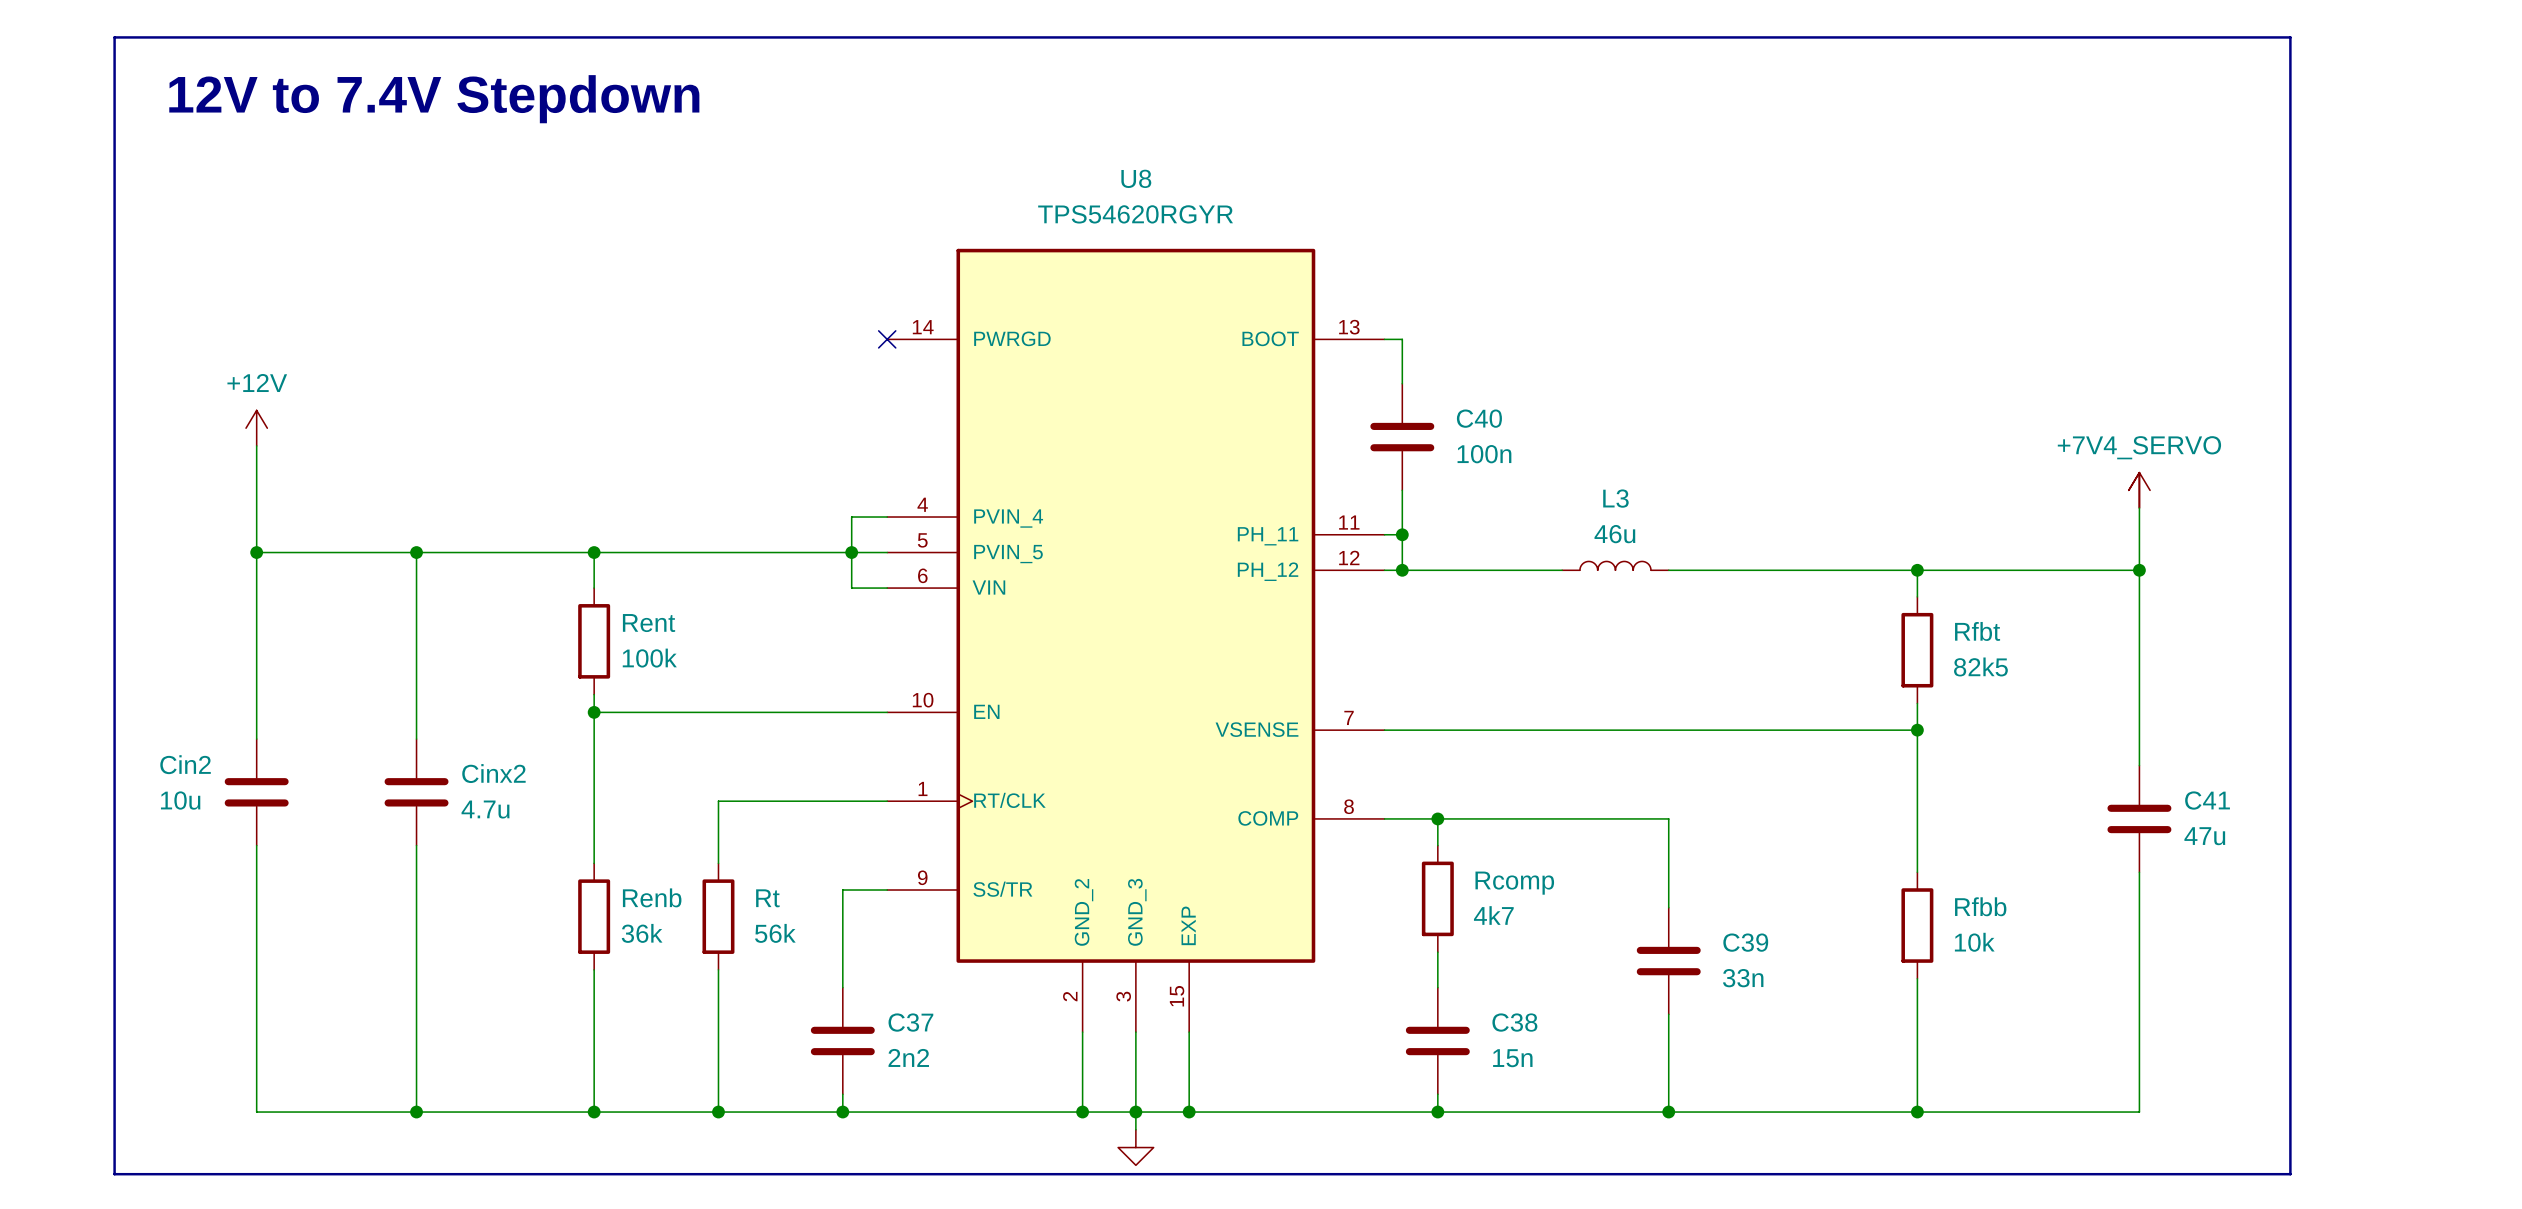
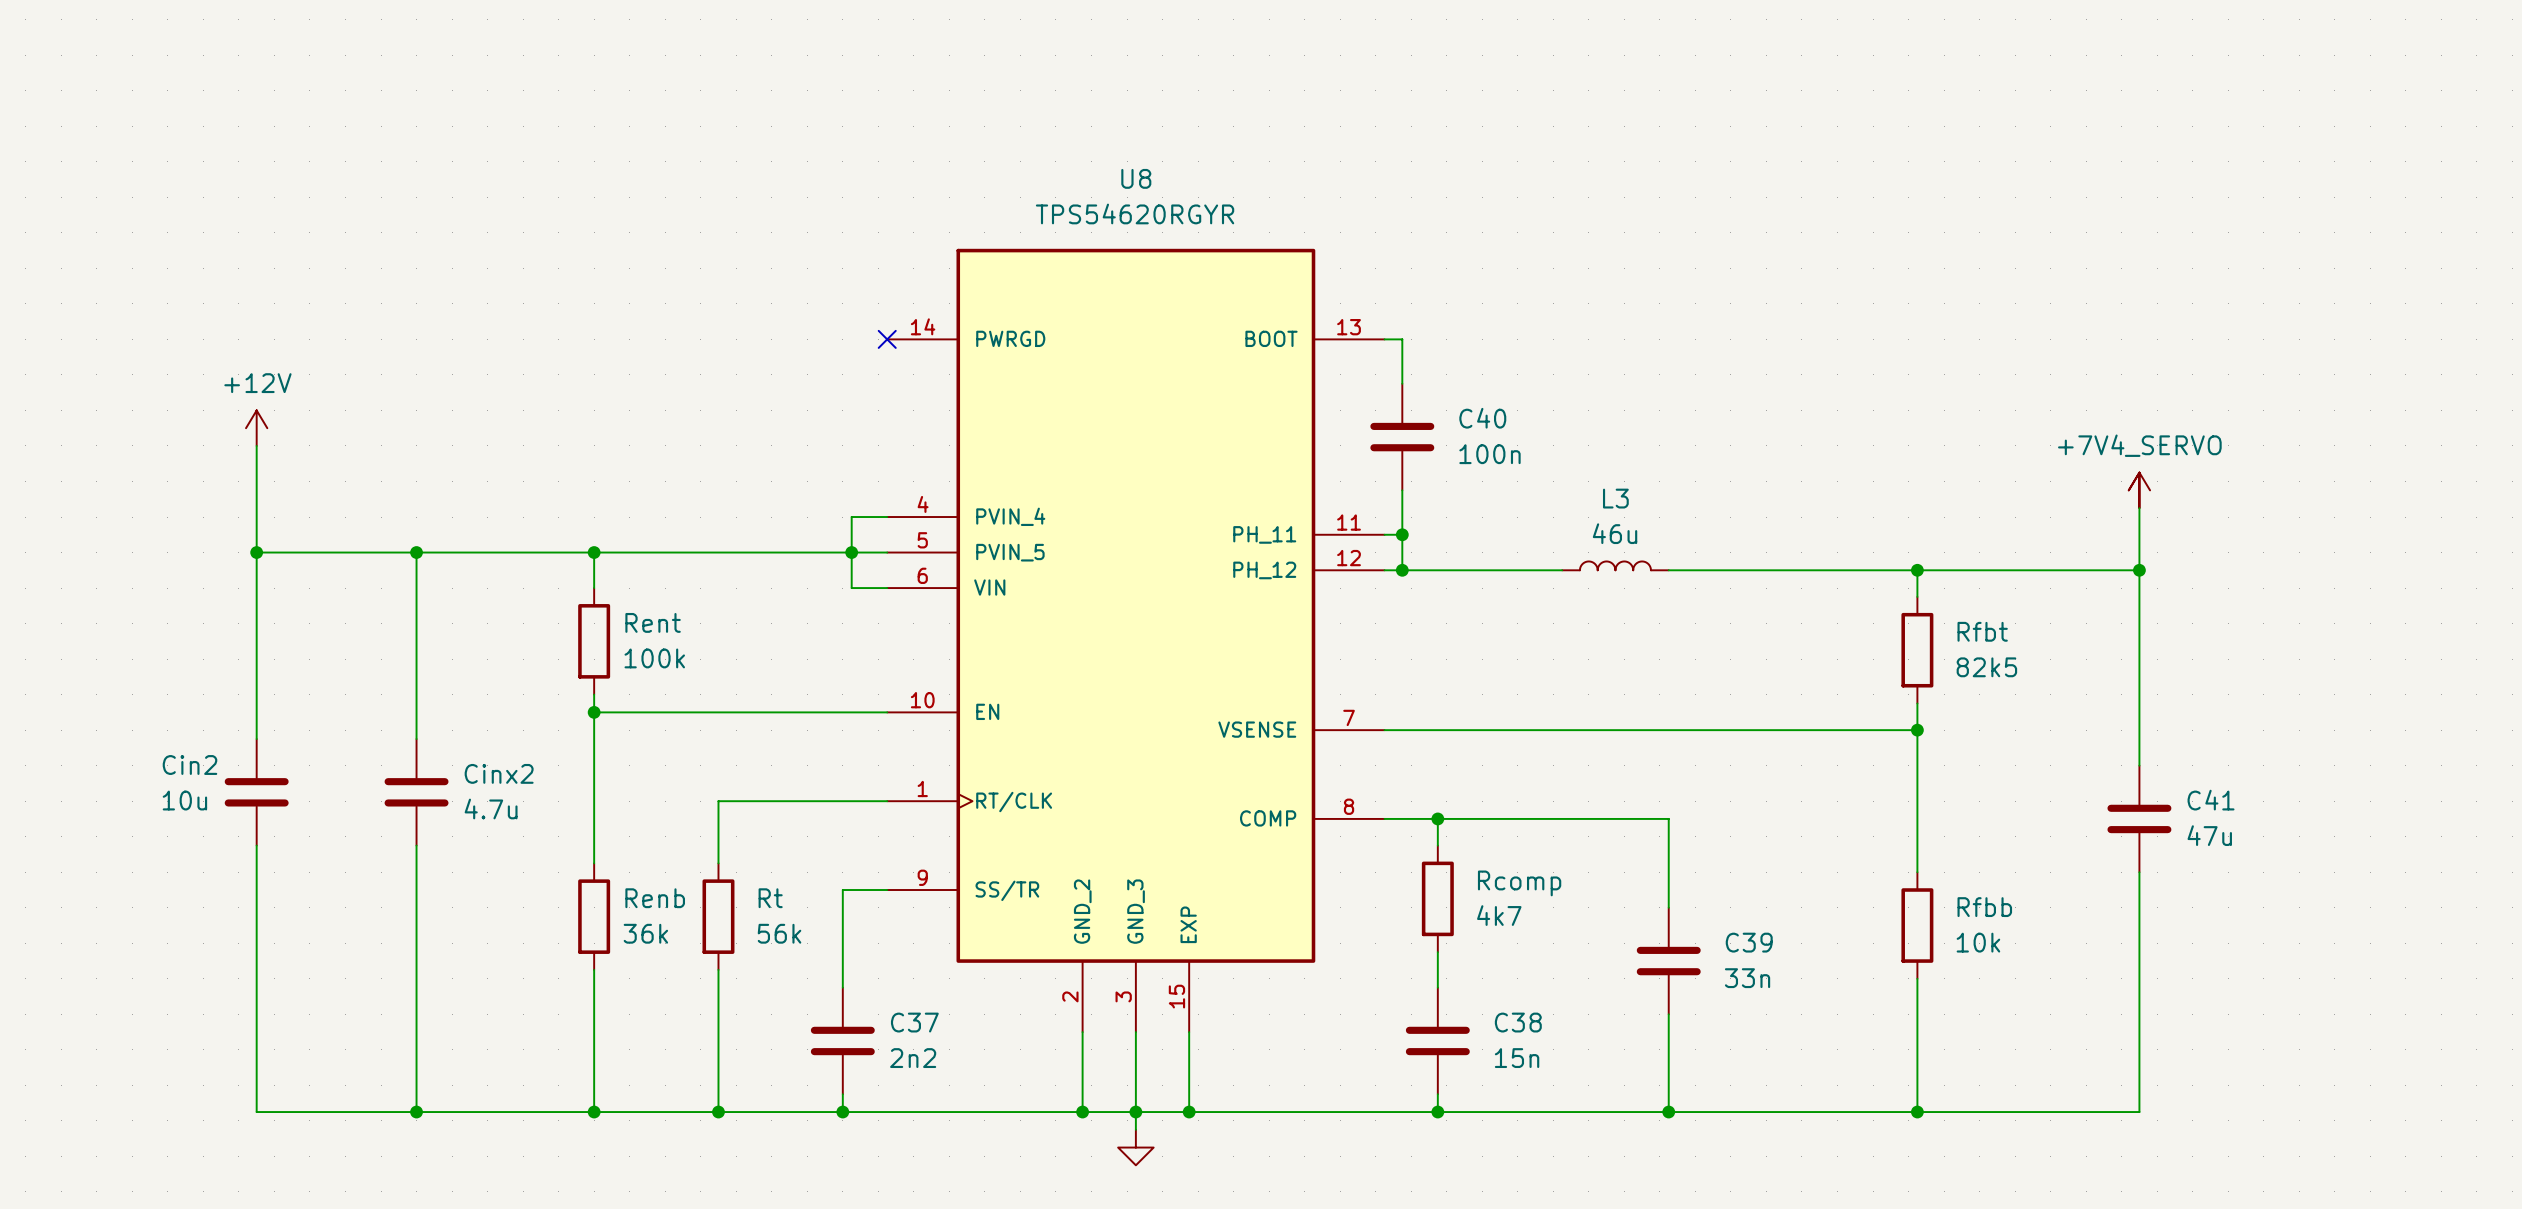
line: (114, 37) (2290, 37) (2290, 1174) (114, 1174) (114, 37) -> none
text: 12V to 7.4V Stepdown (434, 99) -> none

